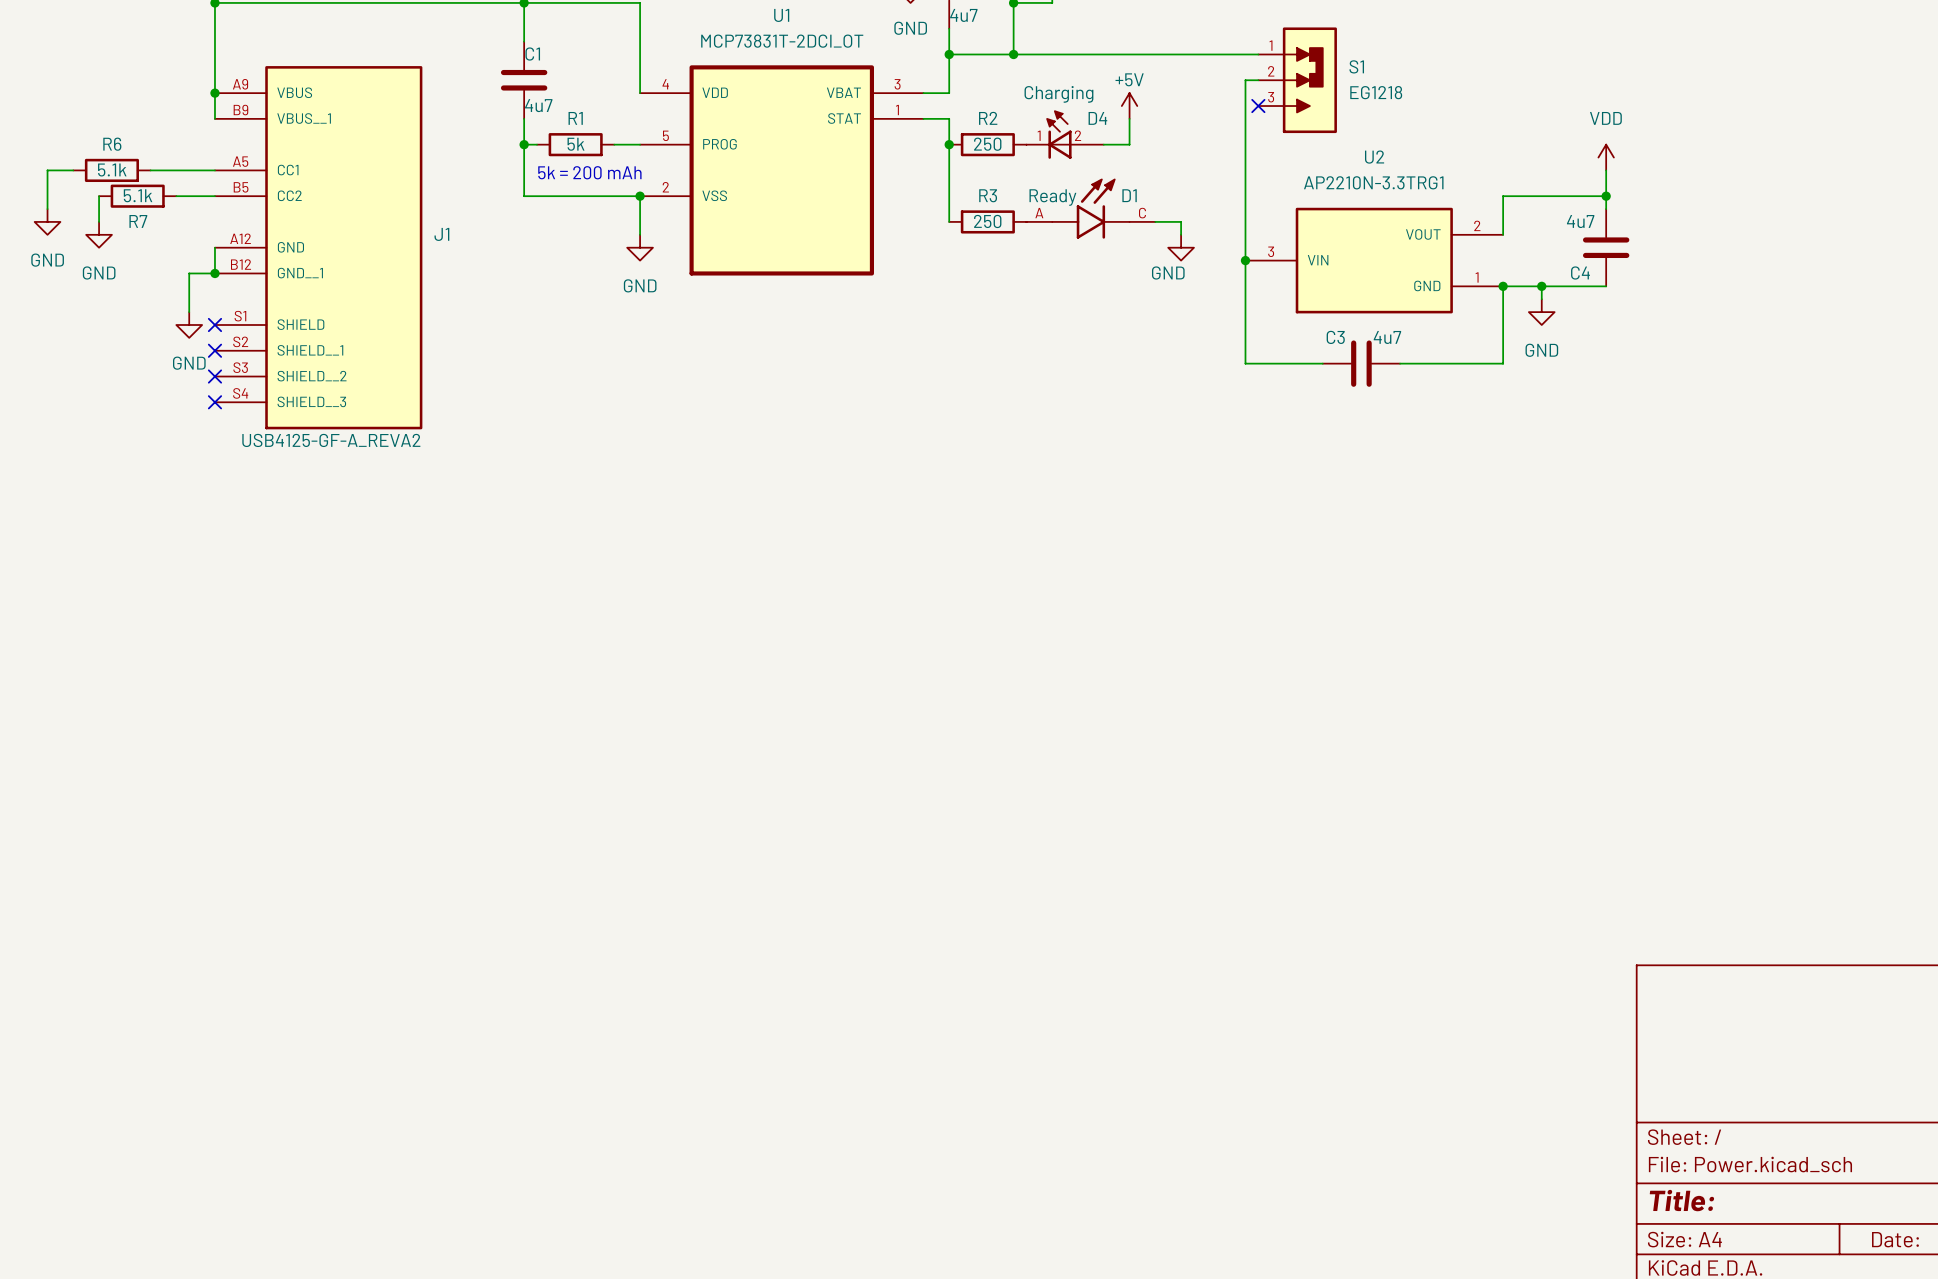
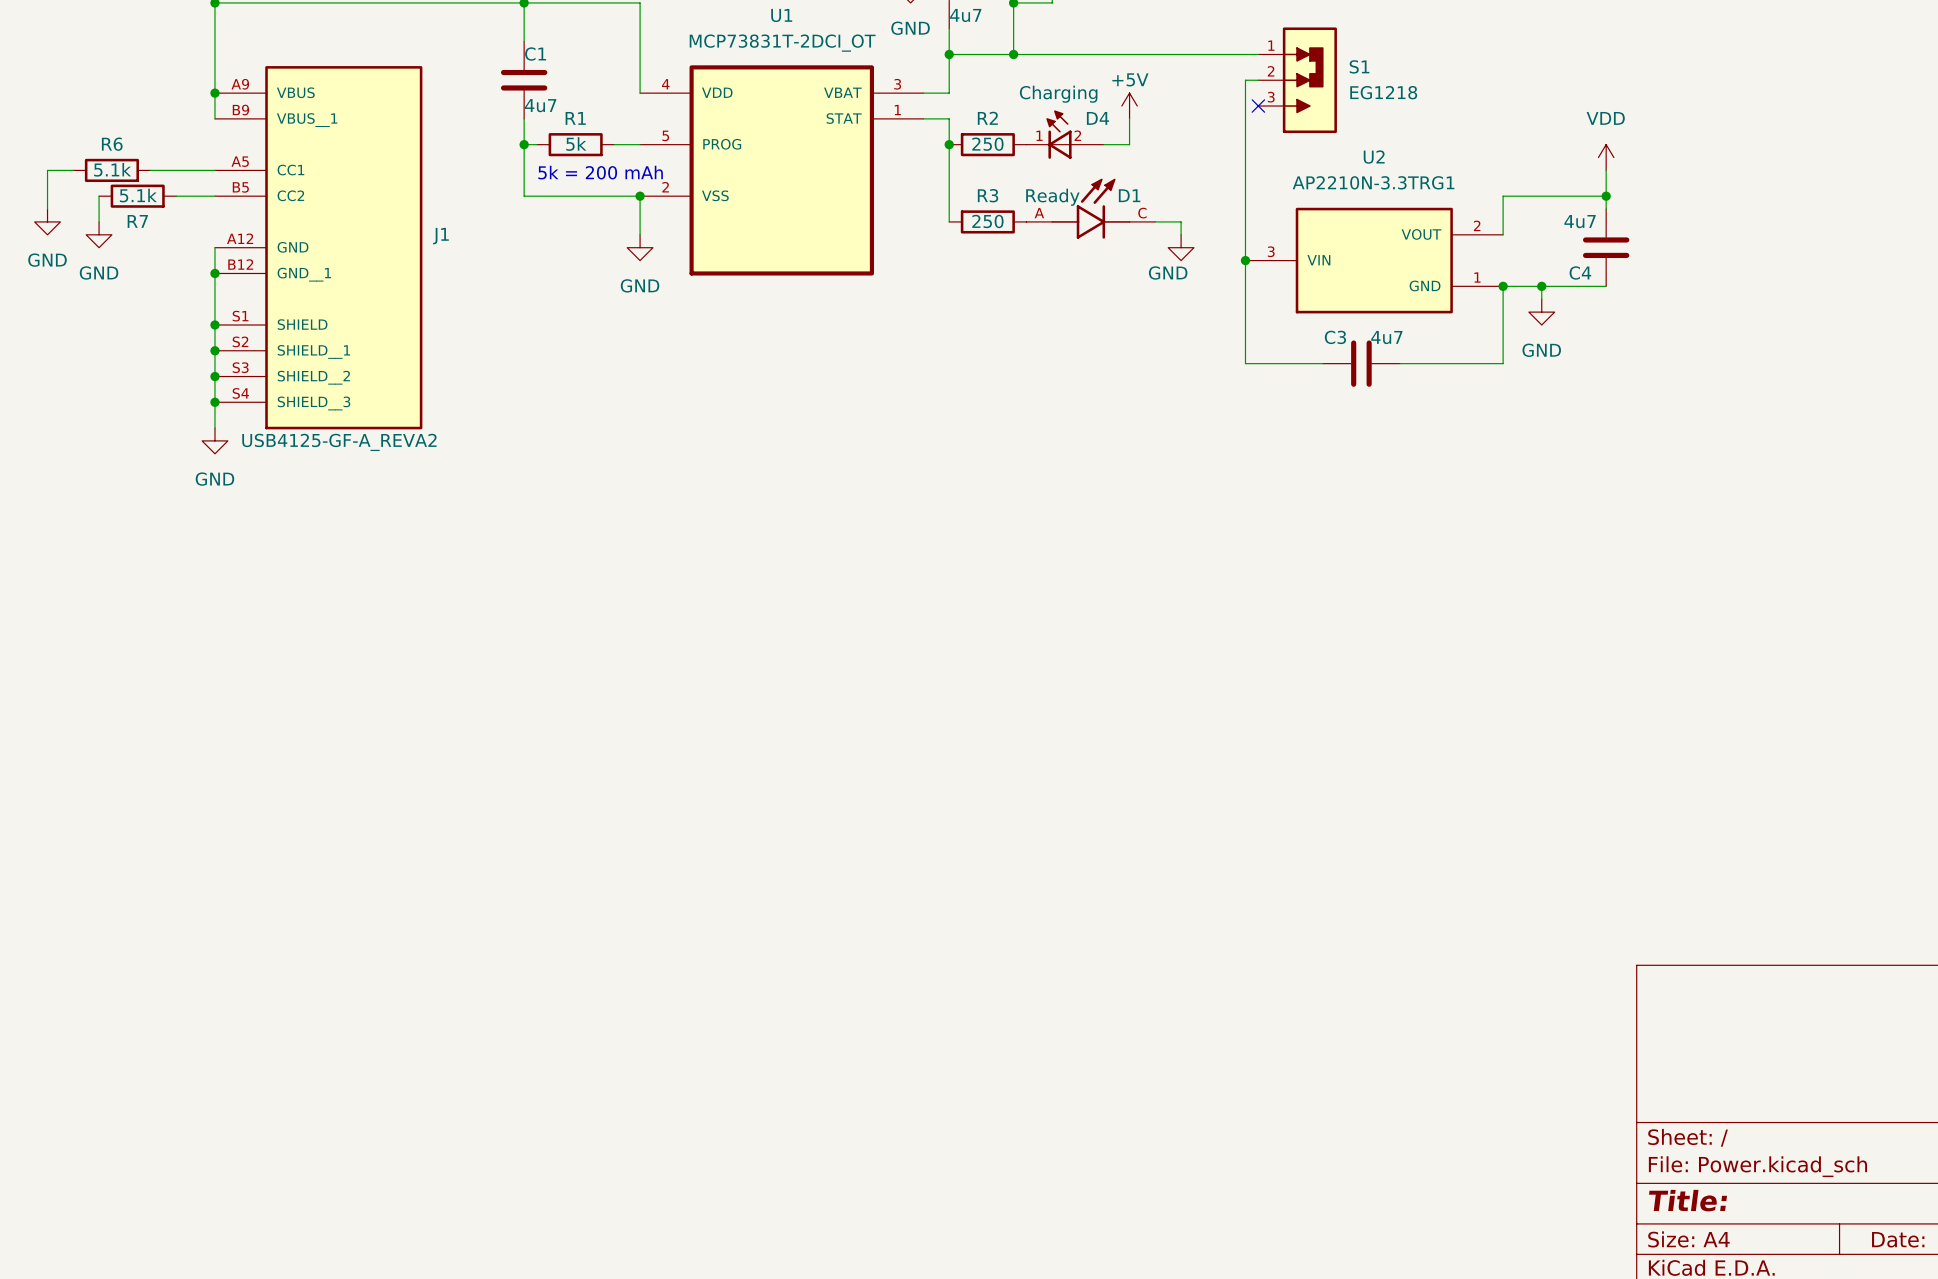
wire: (214, 273) (189, 273) (189, 312) -> (214, 273) (214, 428)
power symbol position: GND (189, 324) -> GND (214, 440)
no-connect mark: (214, 324) -> none
junction: none -> (214, 324)
no-connect mark: (214, 350) -> none
junction: none -> (214, 350)
no-connect mark: (214, 376) -> none
junction: none -> (214, 376)
no-connect mark: (214, 402) -> none
junction: none -> (214, 402)

